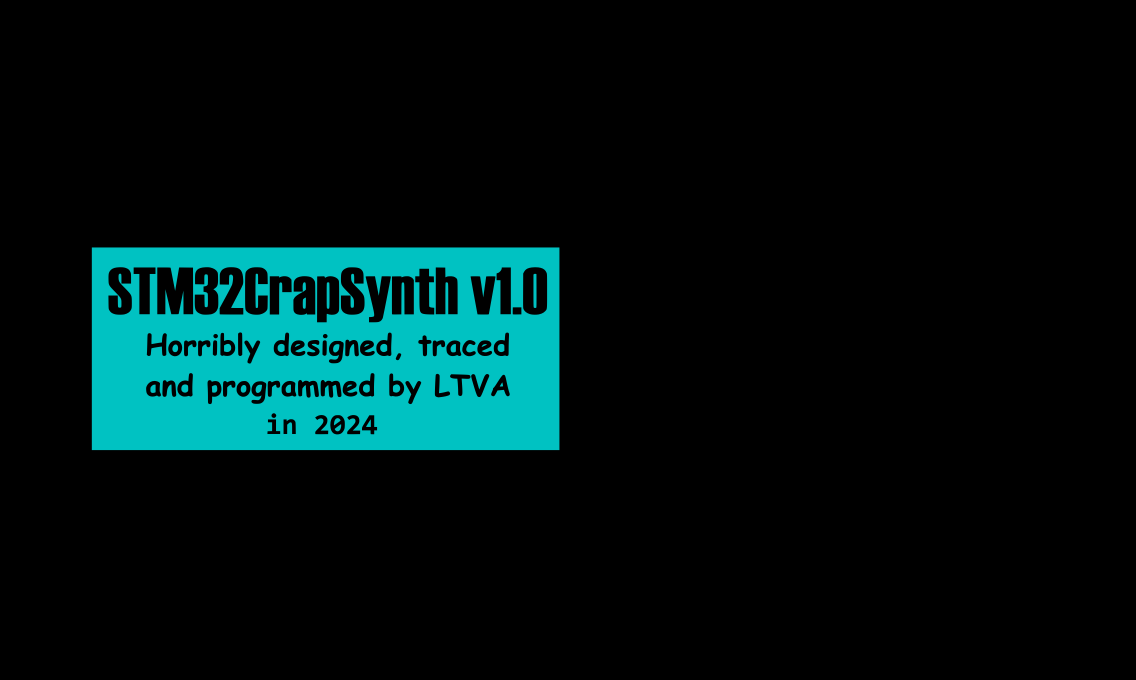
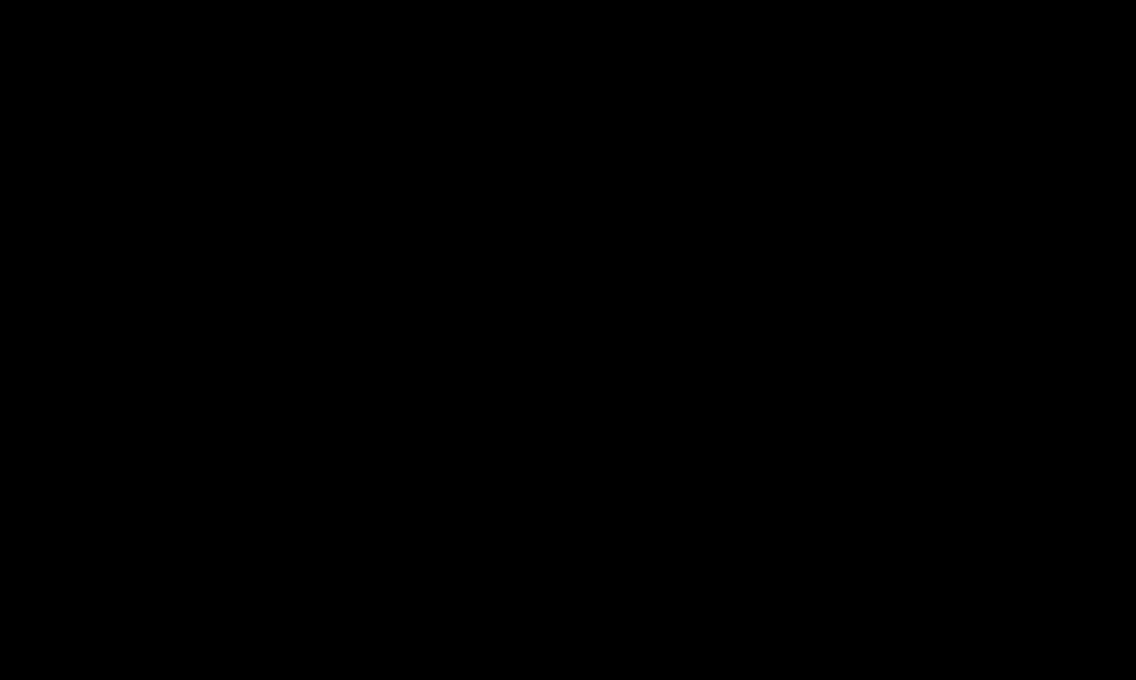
drawing: [91, 247, 560, 451] -> none

